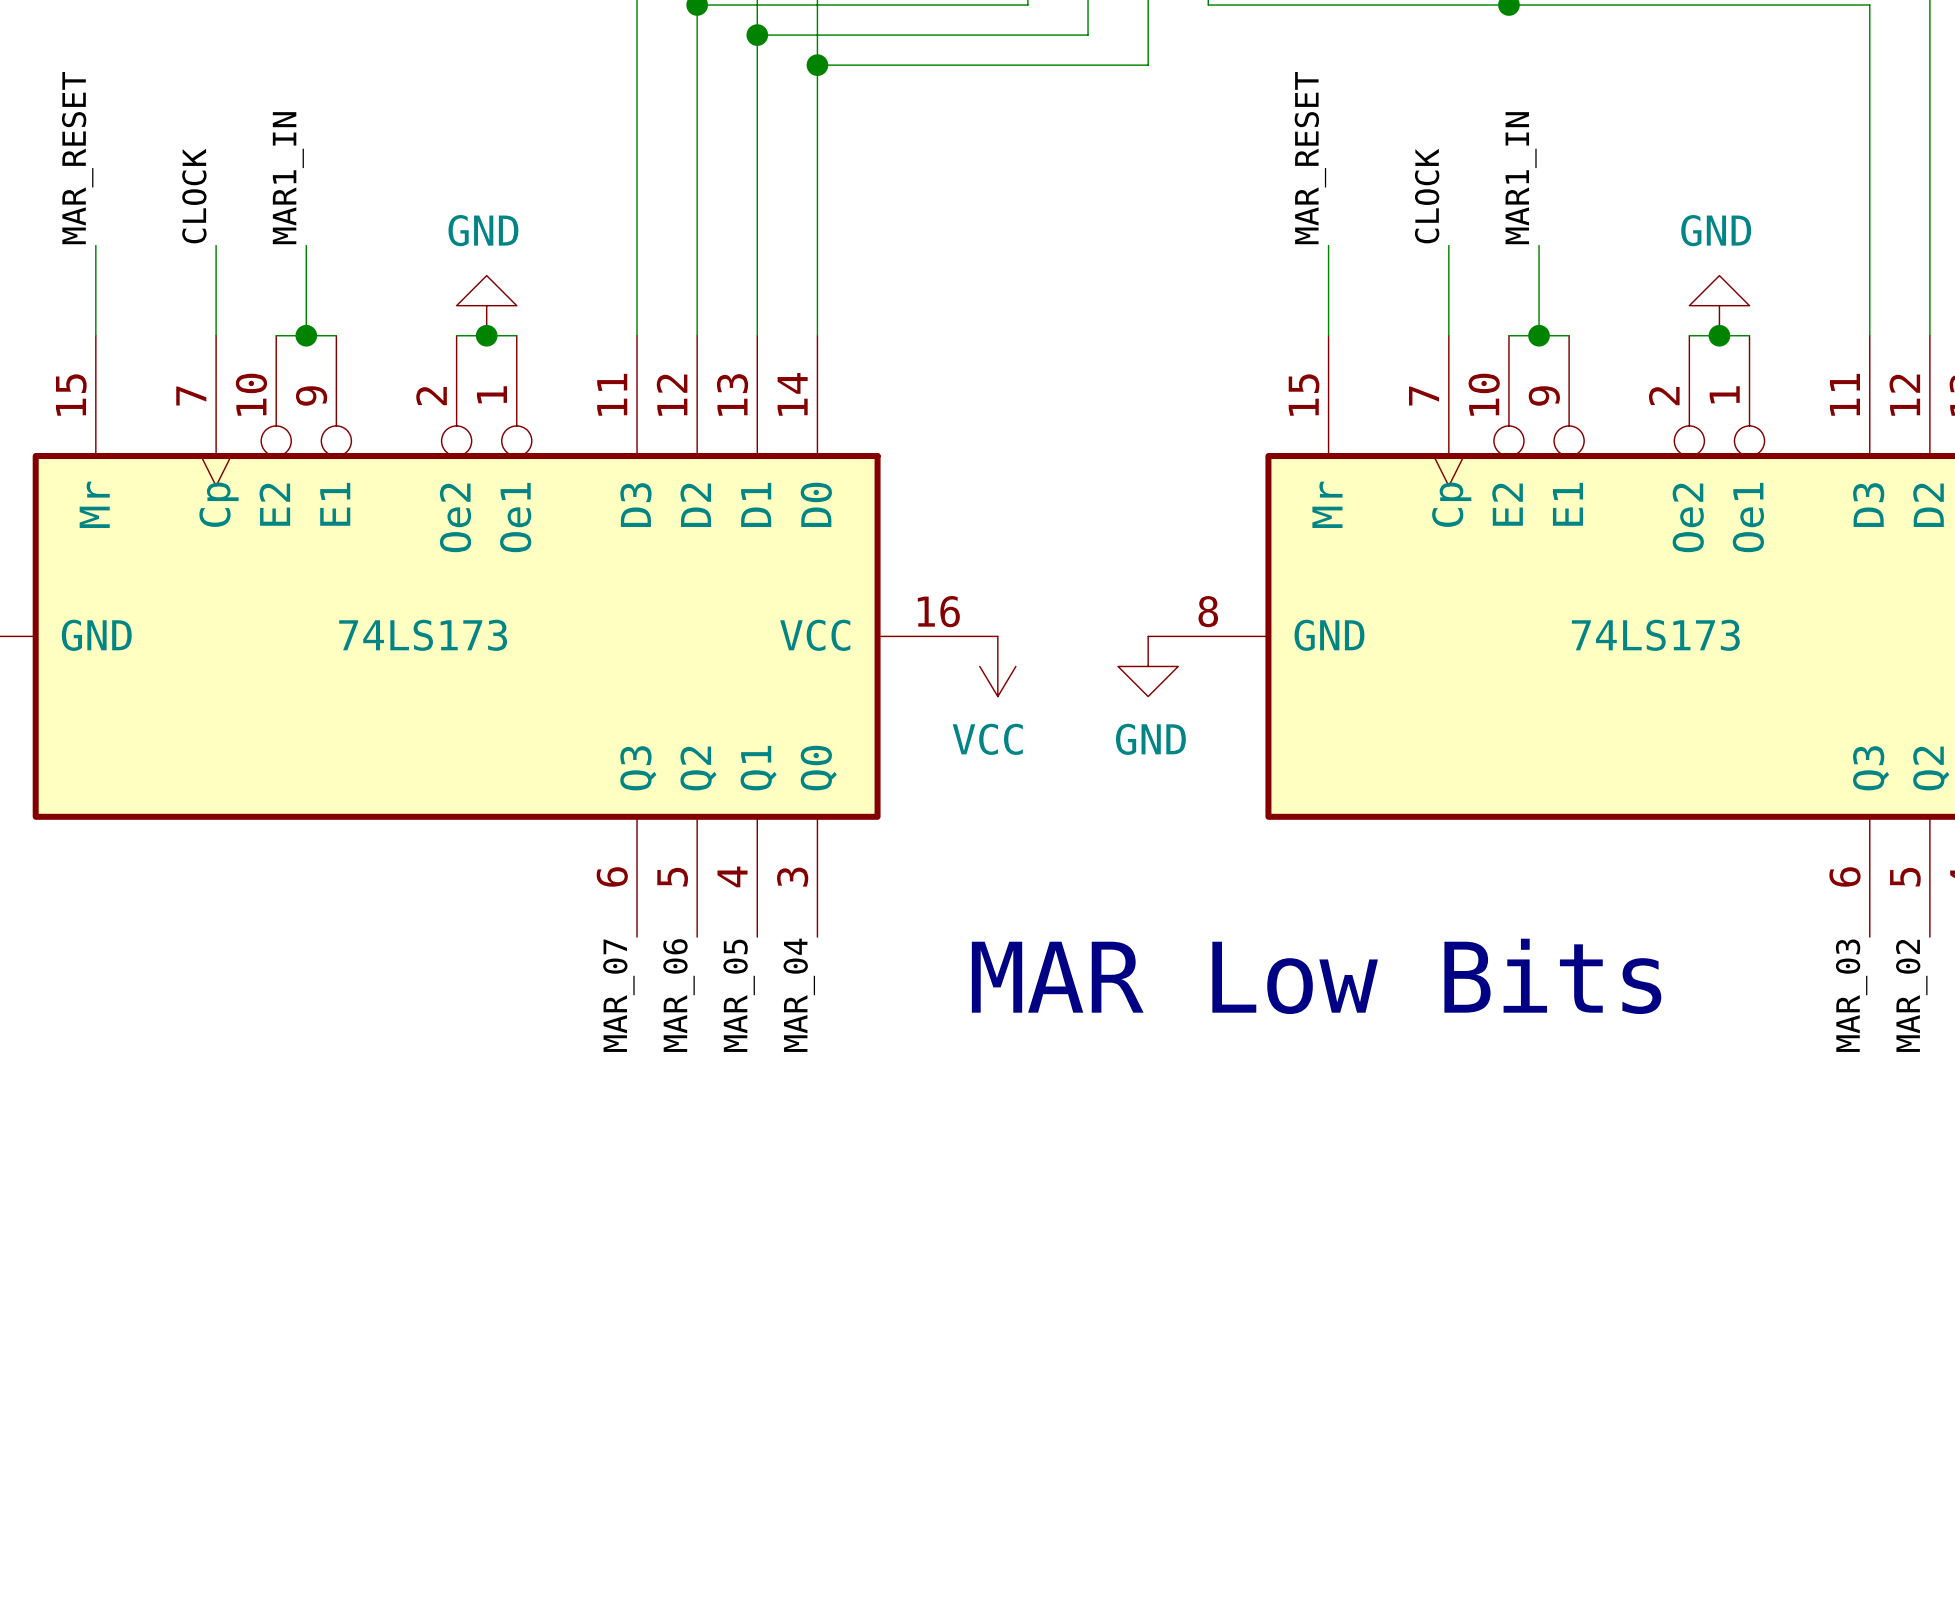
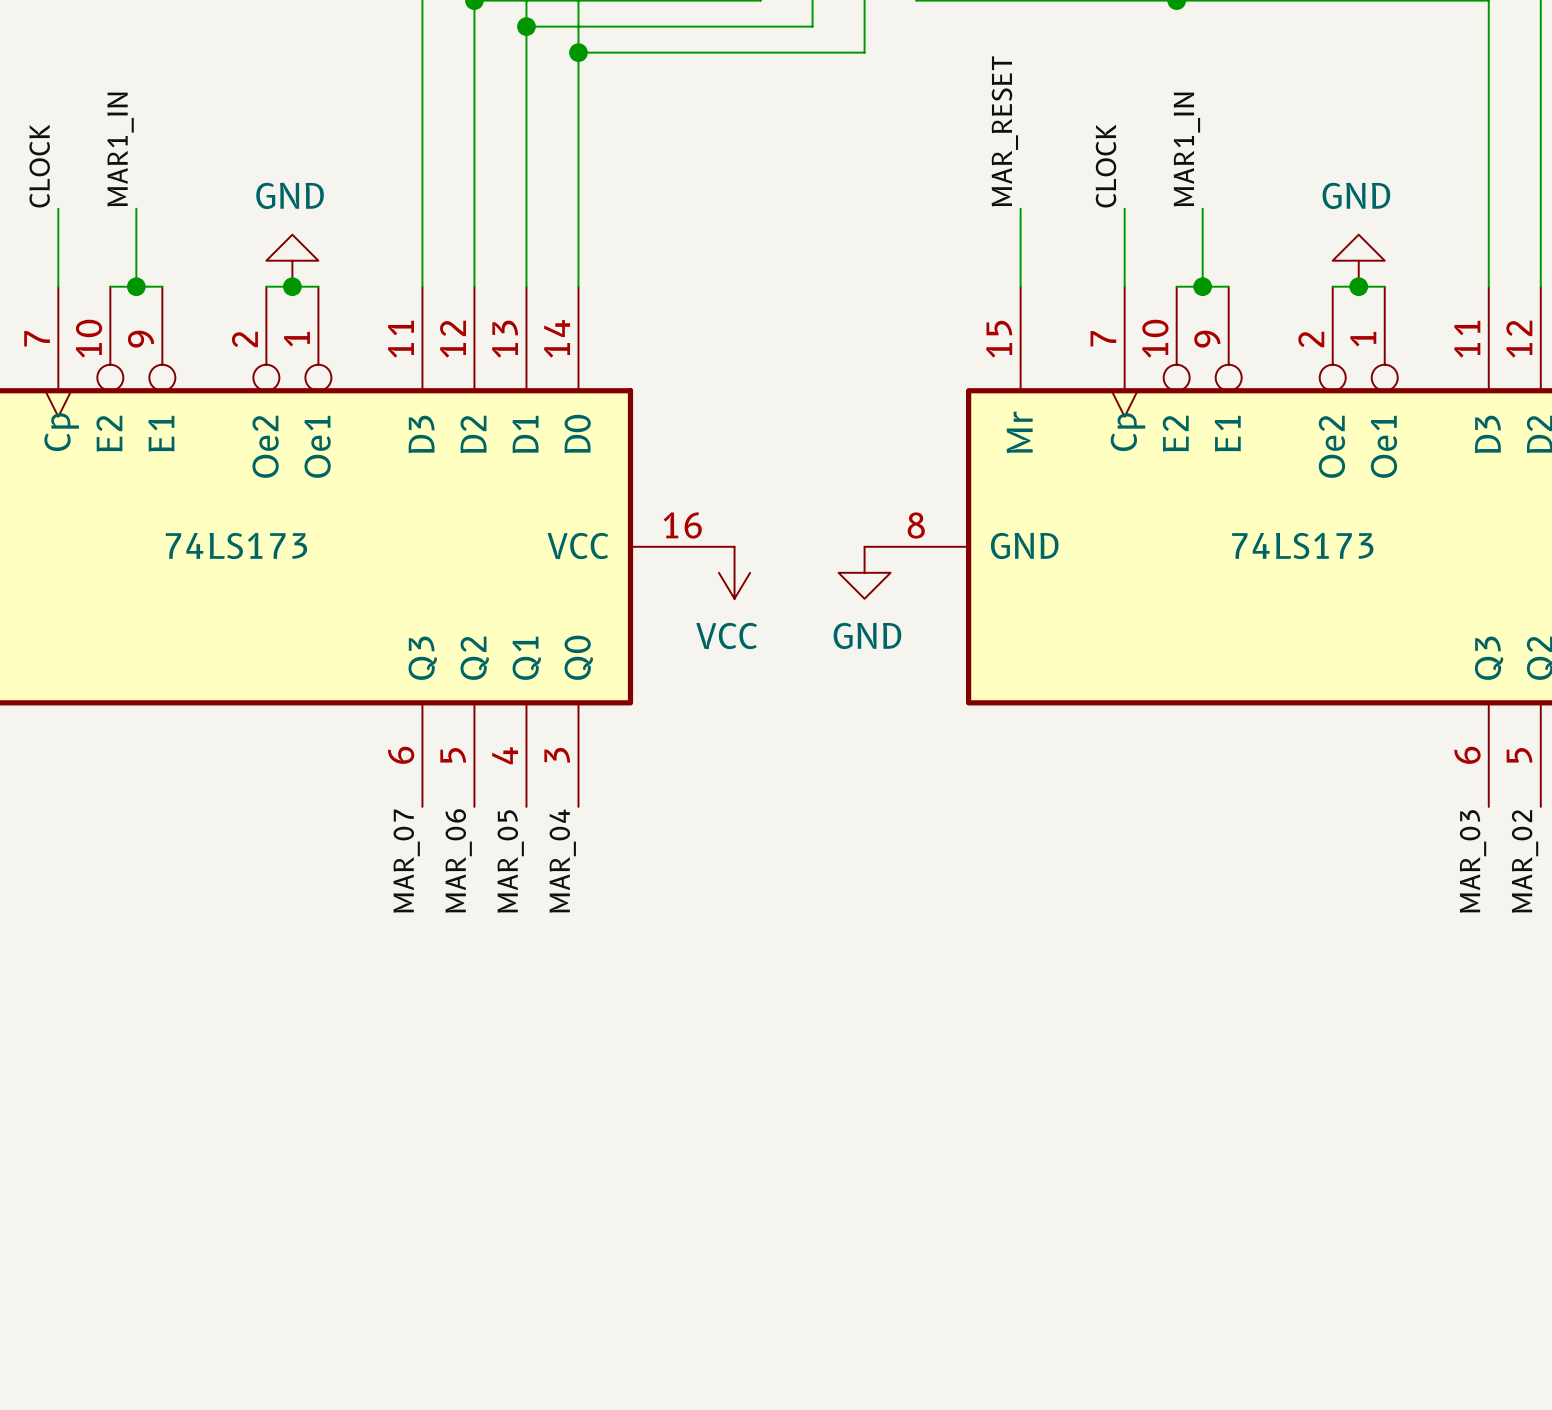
text: MAR Low Bits (1316, 976) -> none

